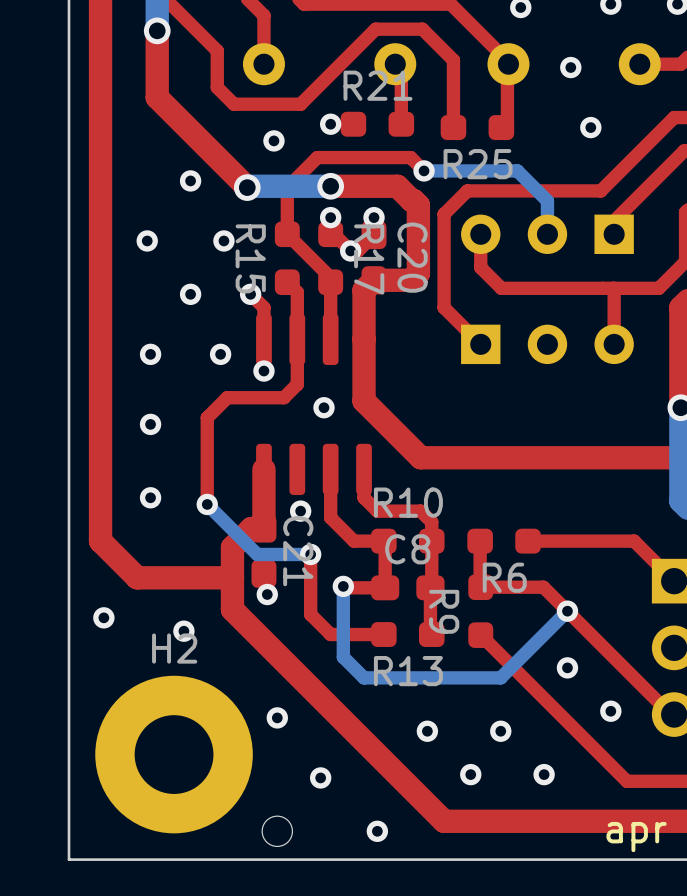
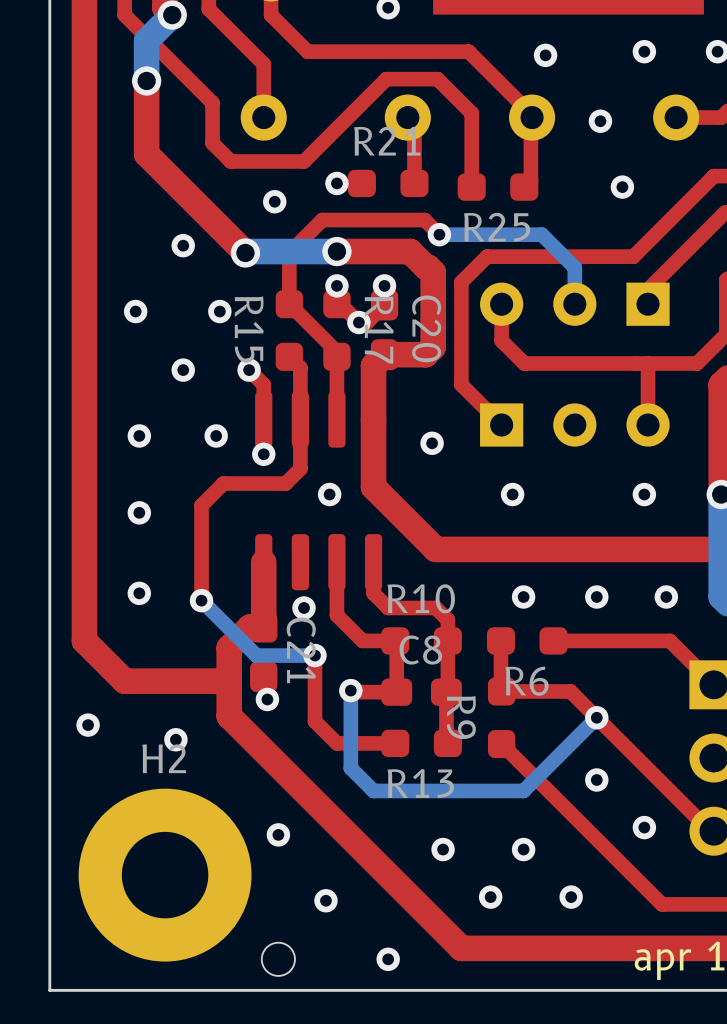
via: none -> (432, 443)
via: none -> (512, 494)
via: none -> (644, 494)
via: none -> (523, 597)
via: none -> (596, 597)
via: none -> (666, 597)

